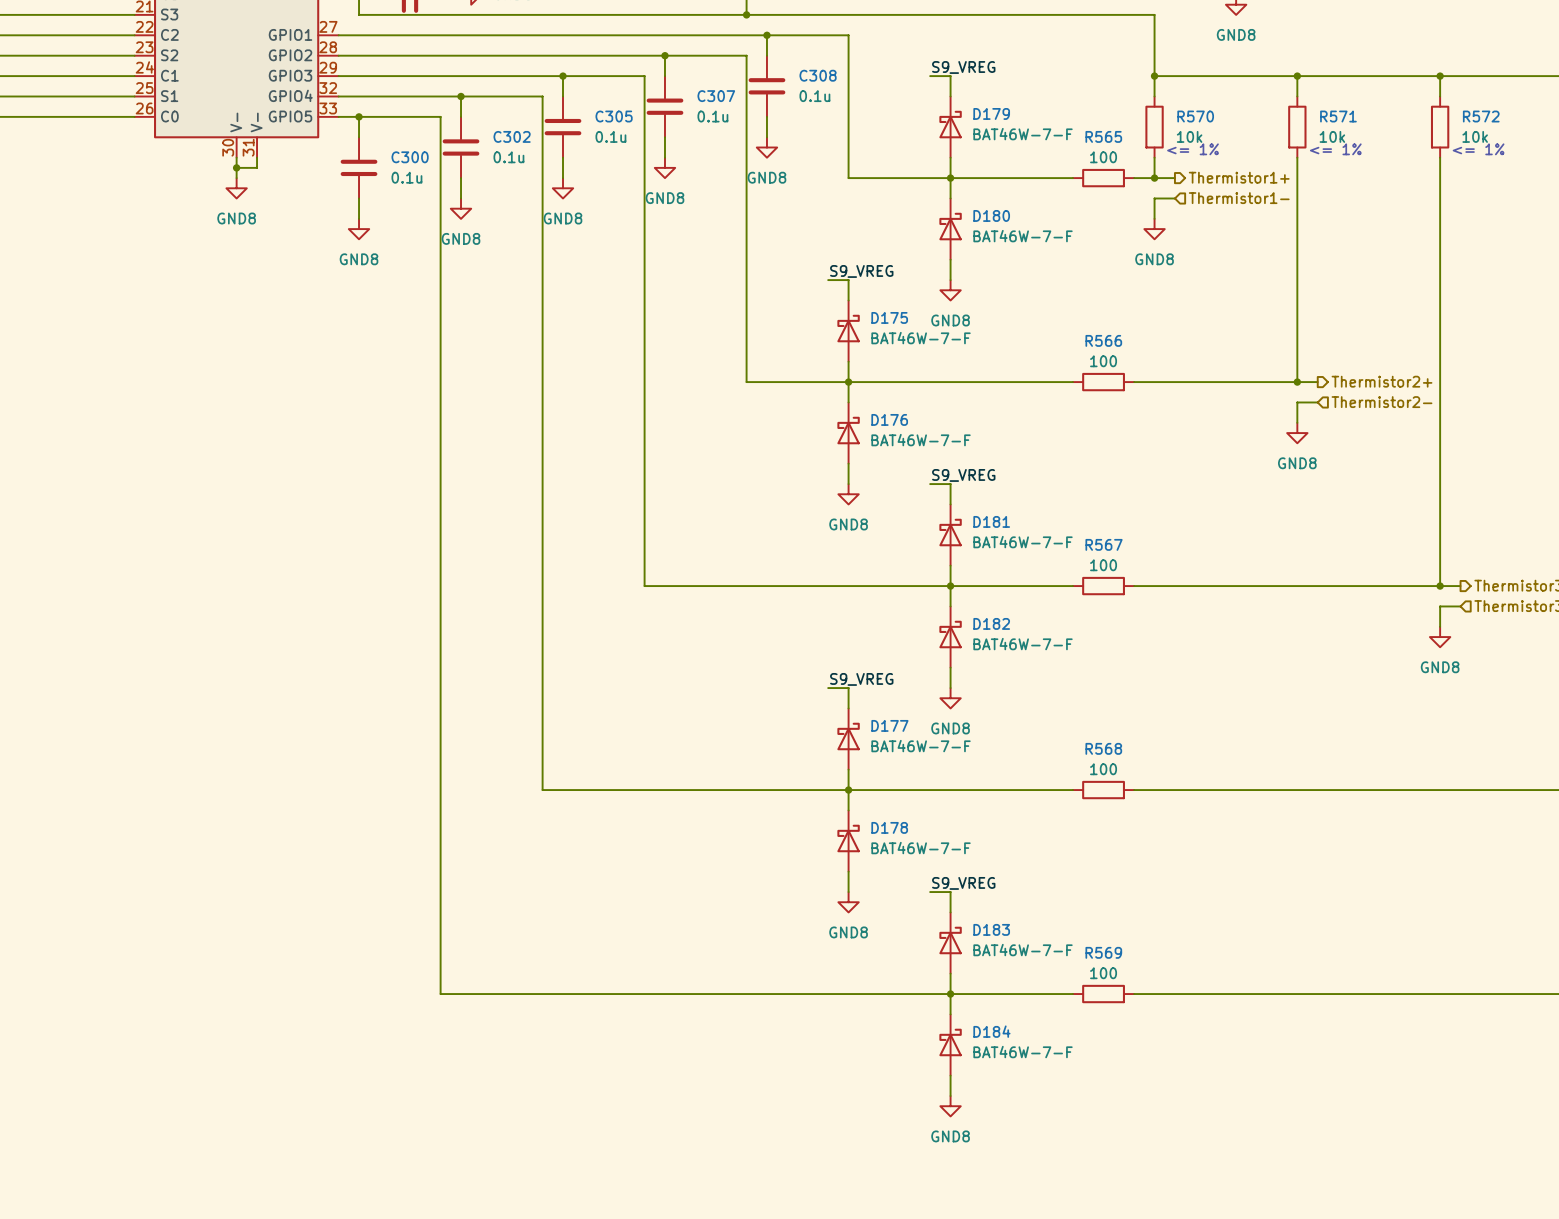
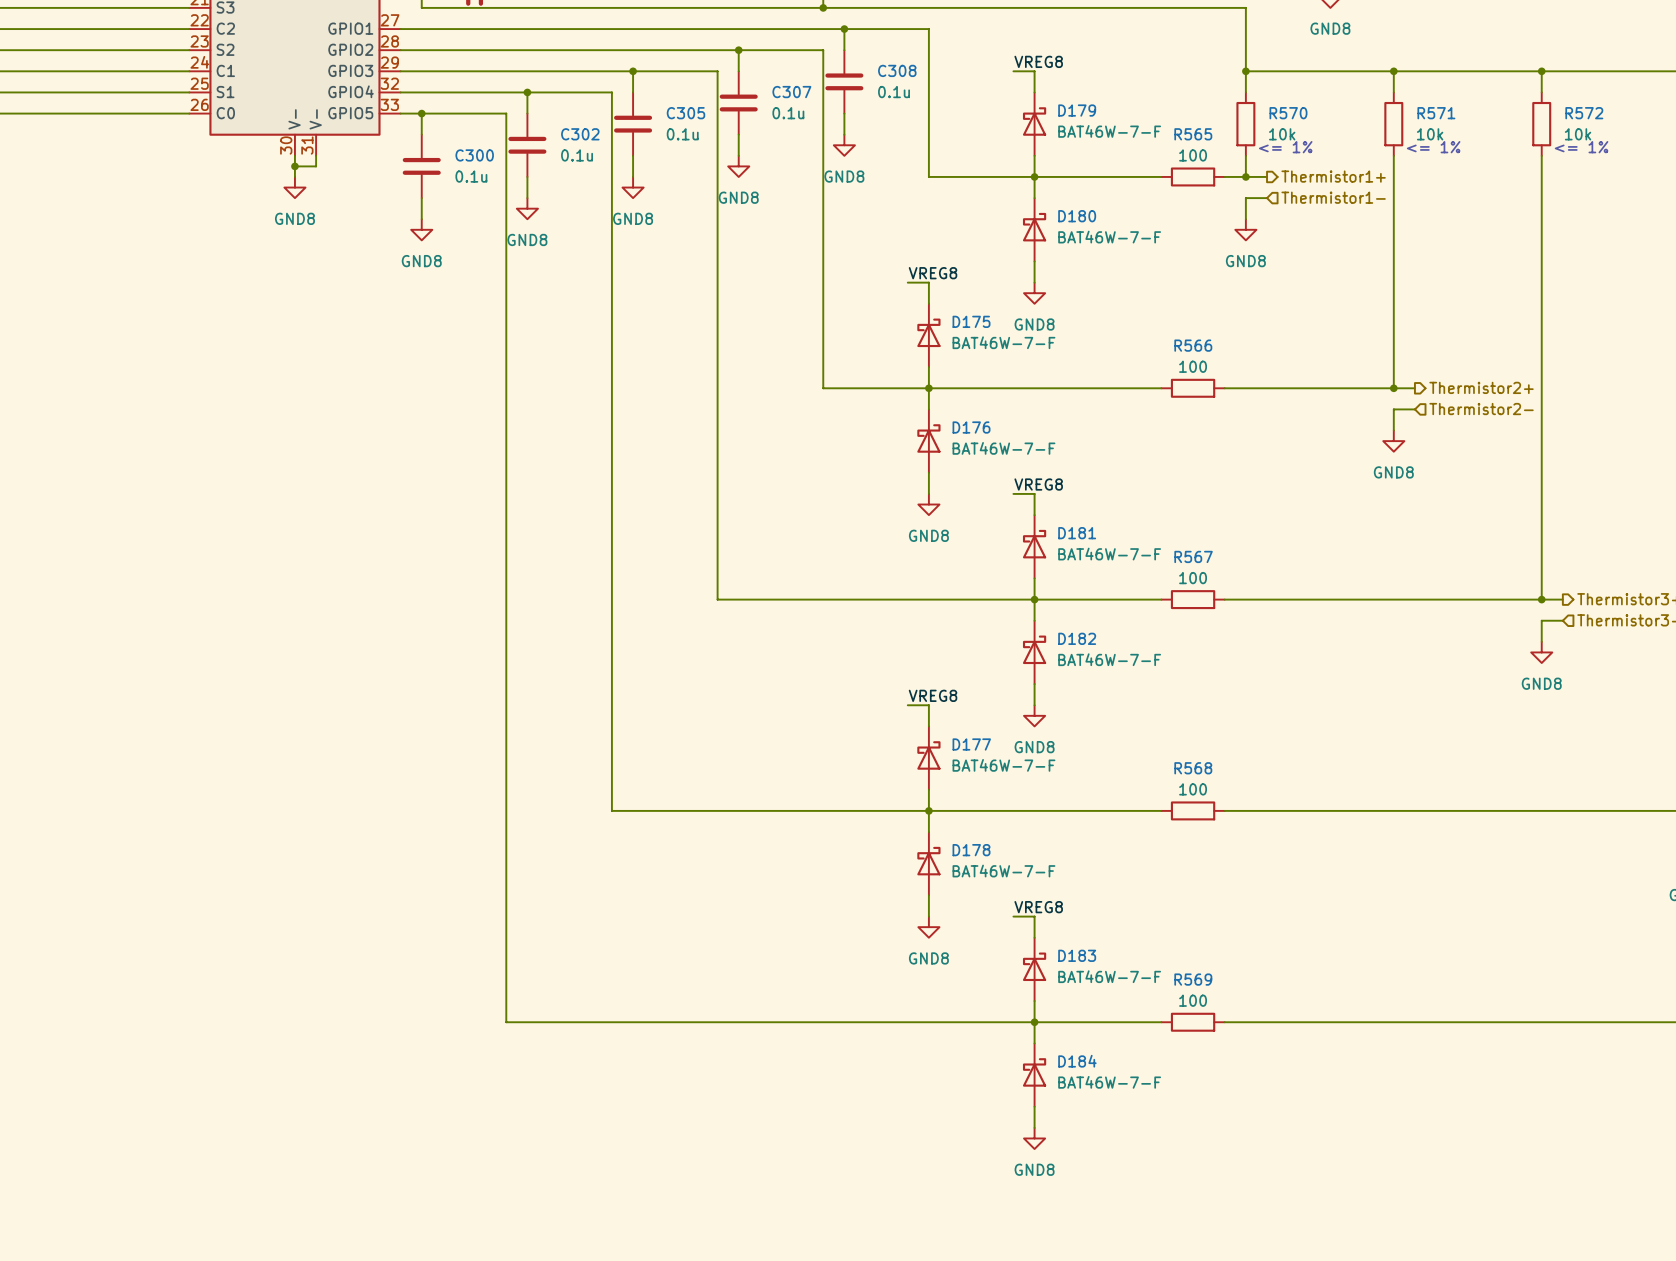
label: S9_VREG (963, 67) -> VREG8 (1038, 61)
label: S9_VREG (861, 271) -> VREG8 (933, 273)
label: S9_VREG (963, 475) -> VREG8 (1038, 484)
label: S9_VREG (861, 679) -> VREG8 (933, 695)
label: S9_VREG (963, 883) -> VREG8 (1038, 907)

